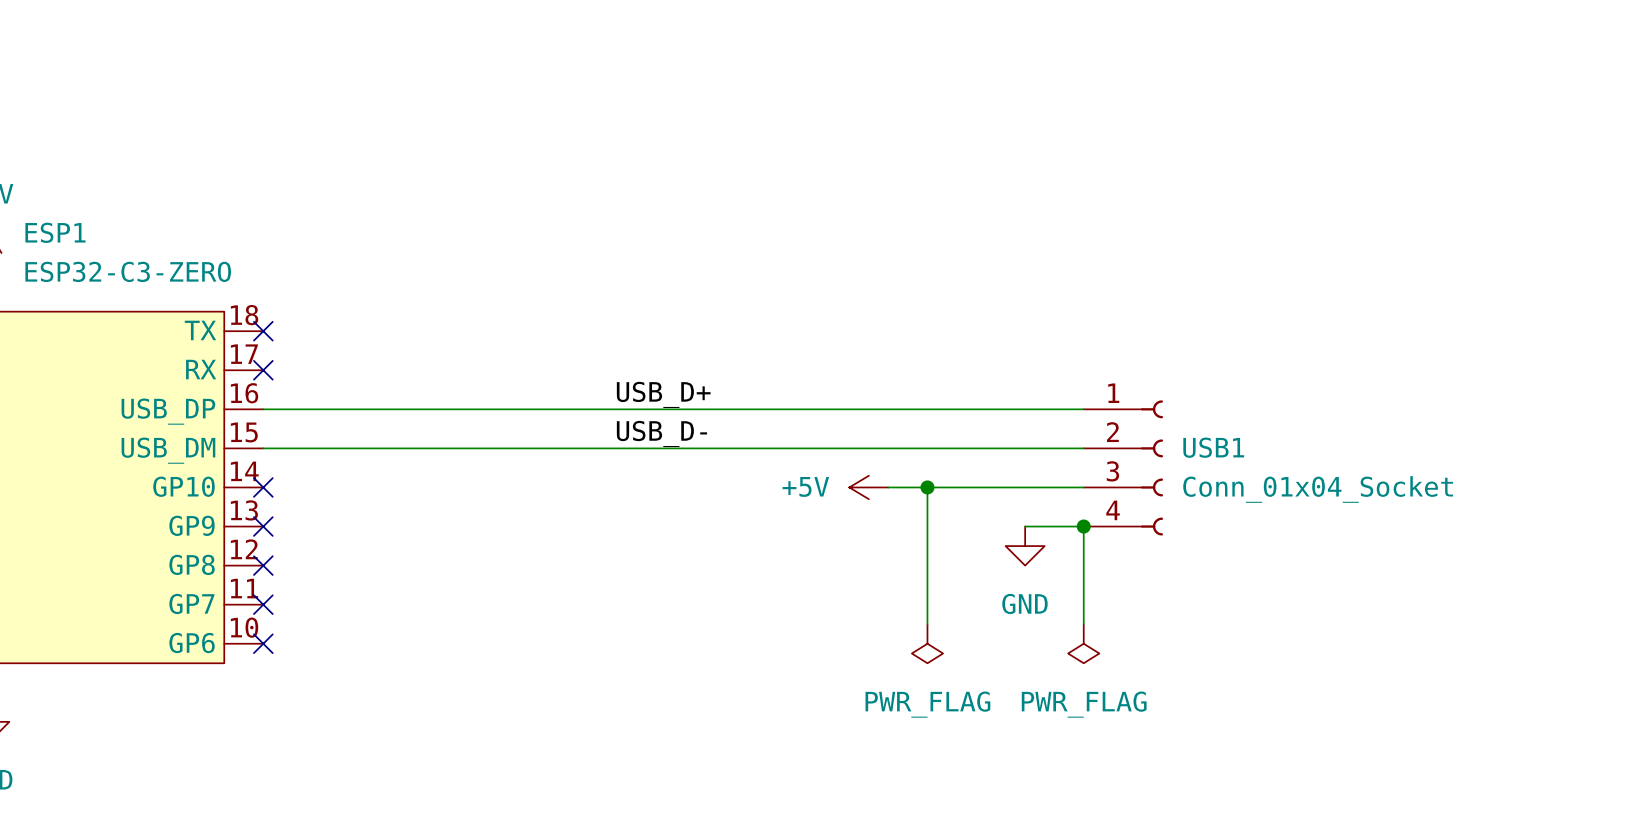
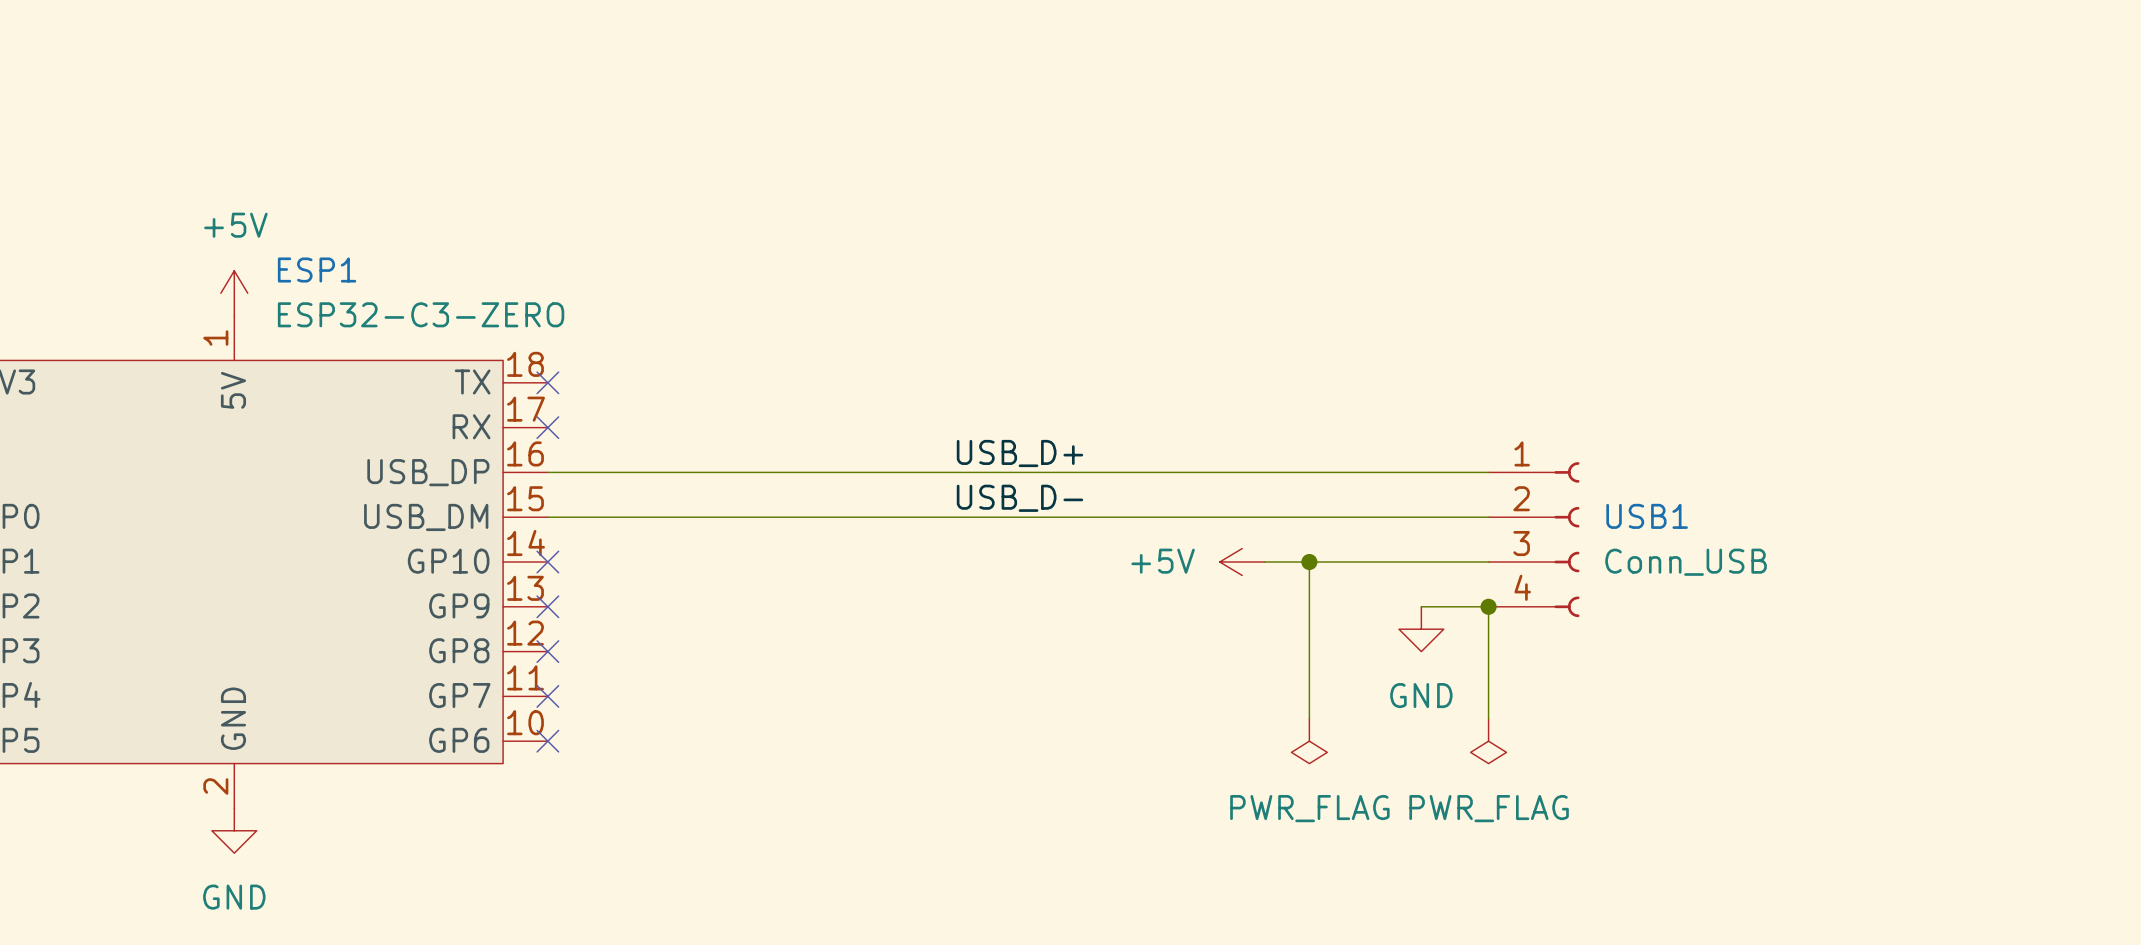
USB1 value: Conn_01x04_Socket (1318, 489) -> Conn_USB (1686, 562)

